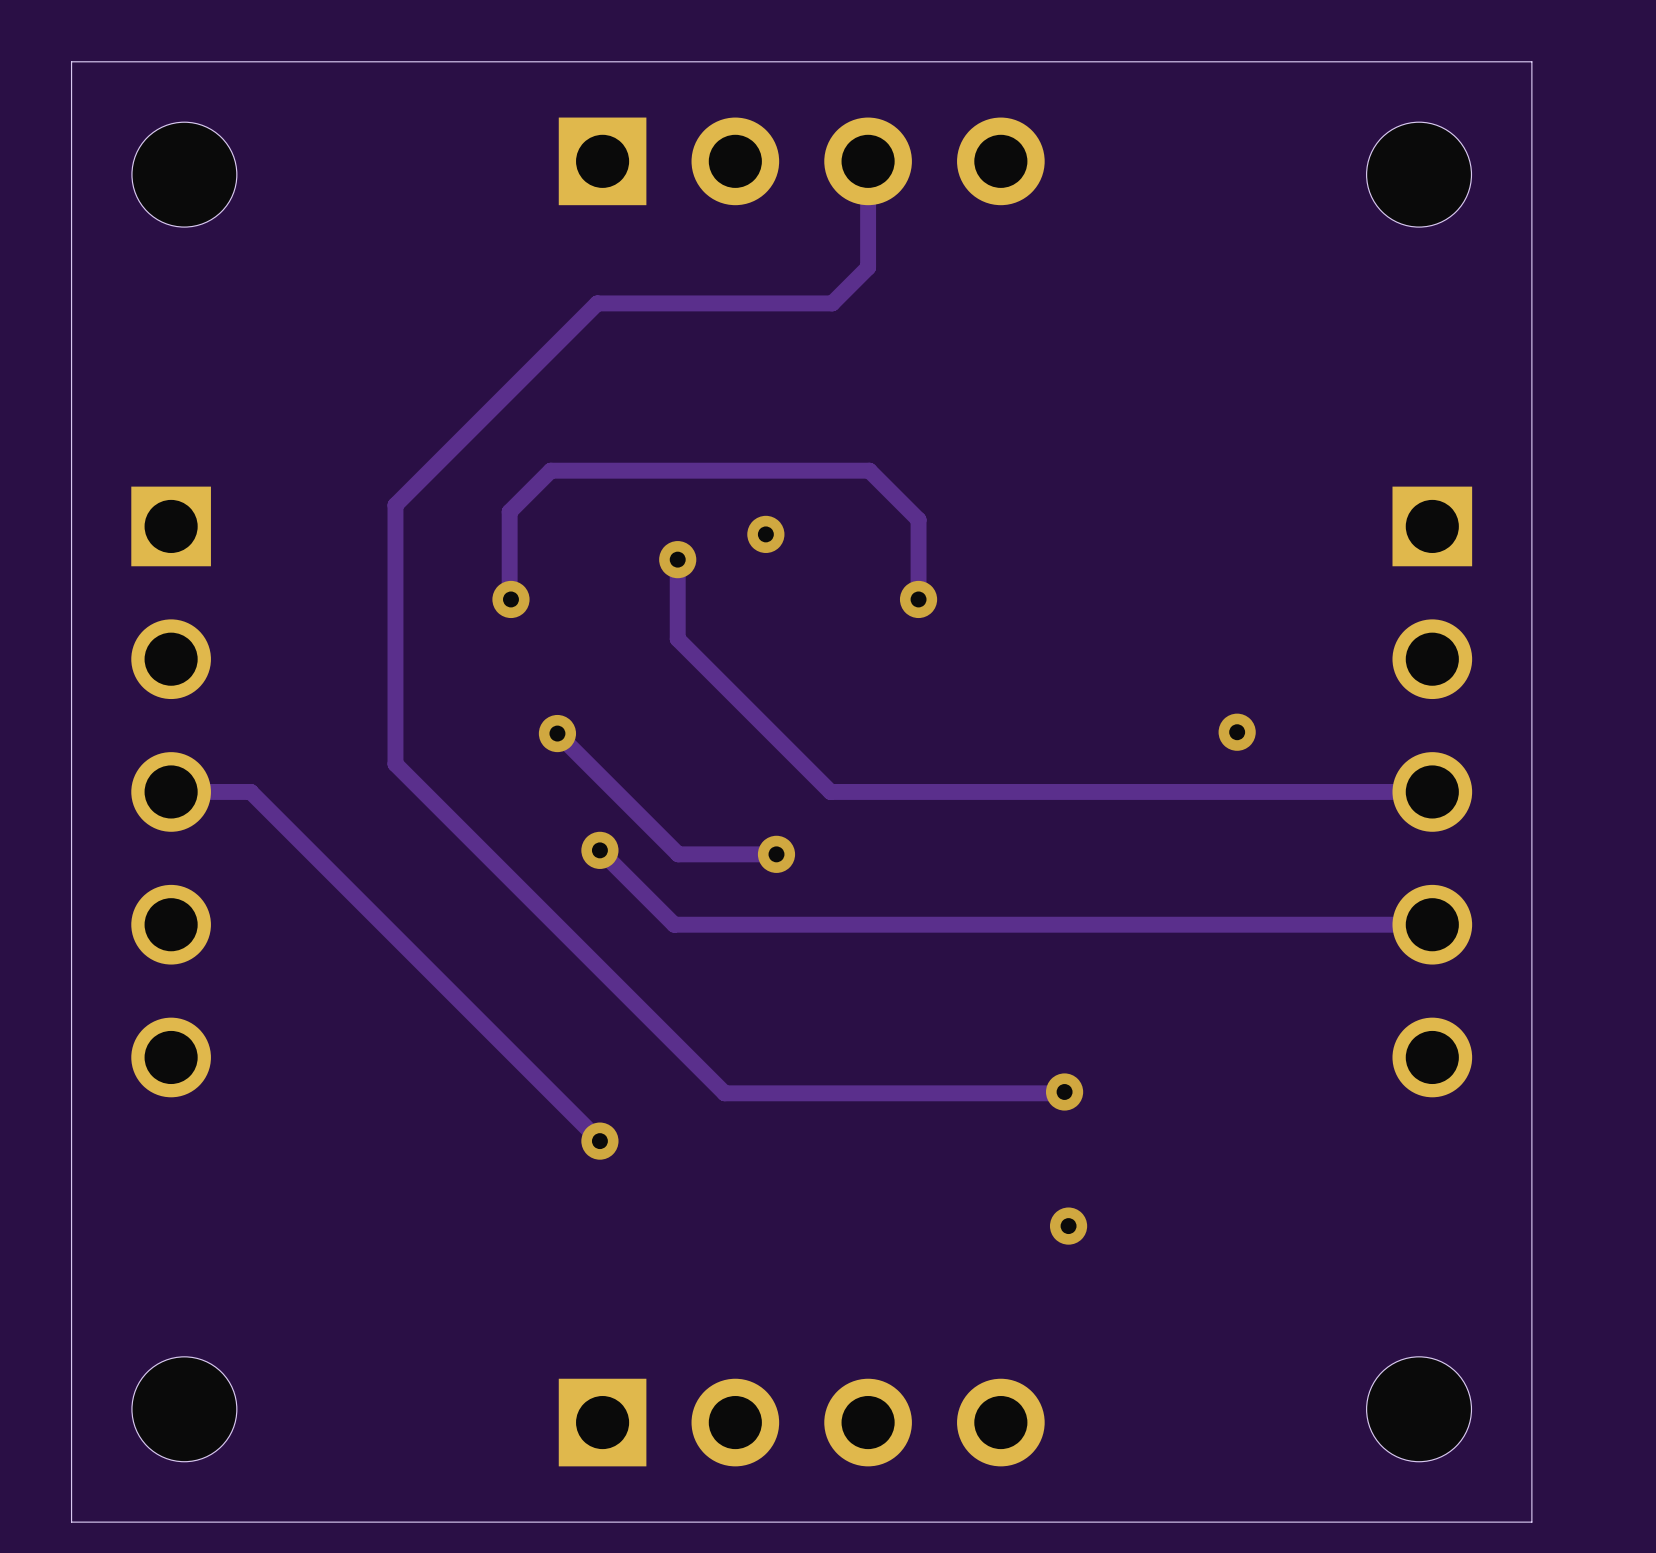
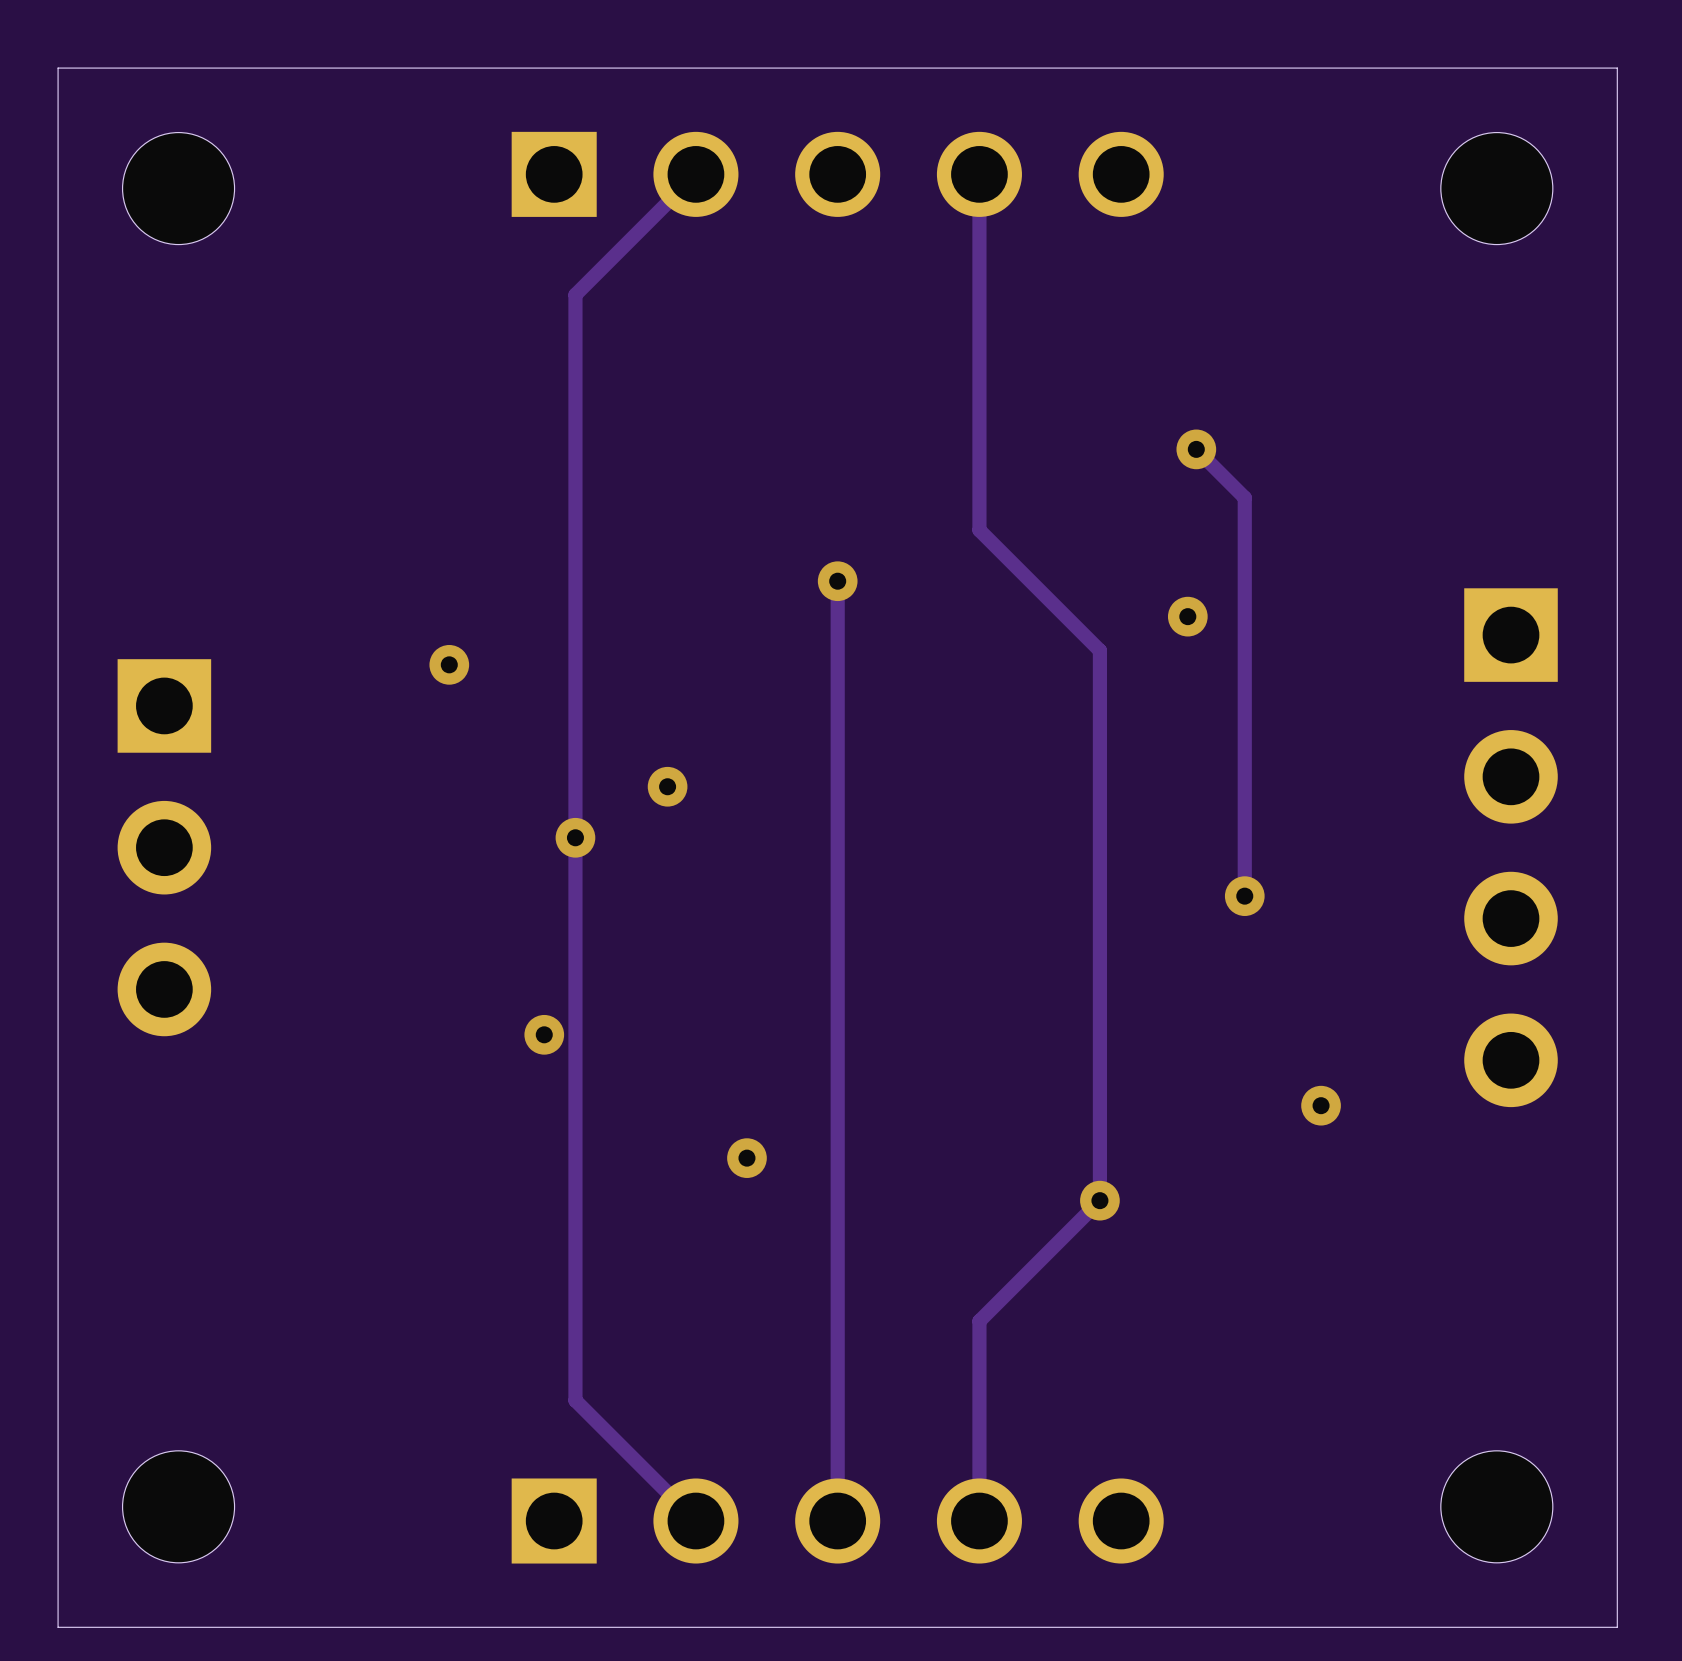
part footprint: [558, 117, 1045, 206] -> [511, 131, 1164, 217]
track: none -> (695, 174) (575, 294) (575, 1400) (695, 1521)
track: (868, 161) (868, 267) (832, 303) (597, 303) (395, 505) (395, 764) (724, 1093) (1064, 1091) -> none
track: none -> (979, 174) (979, 530) (1099, 650) (1099, 1200) (979, 1321) (979, 1521)
track: none -> (1196, 449) (1244, 497) (1244, 896)
via: none -> (1196, 449)
part footprint: [131, 486, 211, 1098] -> [117, 659, 212, 1037]
part footprint: [1392, 486, 1473, 1098] -> [1464, 588, 1558, 1108]
via position: (765, 534) -> (837, 581)
track: none -> (837, 581) (837, 1521)
track: (677, 559) (677, 639) (830, 791) (1432, 791) -> none
via: (677, 559) -> none
via: none -> (1187, 616)
via position: (510, 599) -> (449, 664)
track: (918, 599) (918, 519) (869, 470) (550, 470) (509, 511) (510, 599) -> none
via: (918, 599) -> none
via: (1237, 732) -> none
track: (557, 733) (678, 854) (776, 854) -> none
via: (557, 733) -> none
via: none -> (667, 786)
via: none -> (575, 837)
track: (171, 791) (250, 791) (599, 1141) -> none
via: none -> (1244, 896)
track: (599, 850) (674, 924) (1432, 924) -> none
via: (599, 850) -> none
via: (776, 854) -> none
via: none -> (544, 1034)
via: none -> (1321, 1105)
via: none -> (746, 1158)
via position: (1064, 1091) -> (1099, 1200)
via: (599, 1141) -> none
via: (1068, 1226) -> none
part footprint: [558, 1378, 1045, 1467] -> [511, 1478, 1164, 1564]

